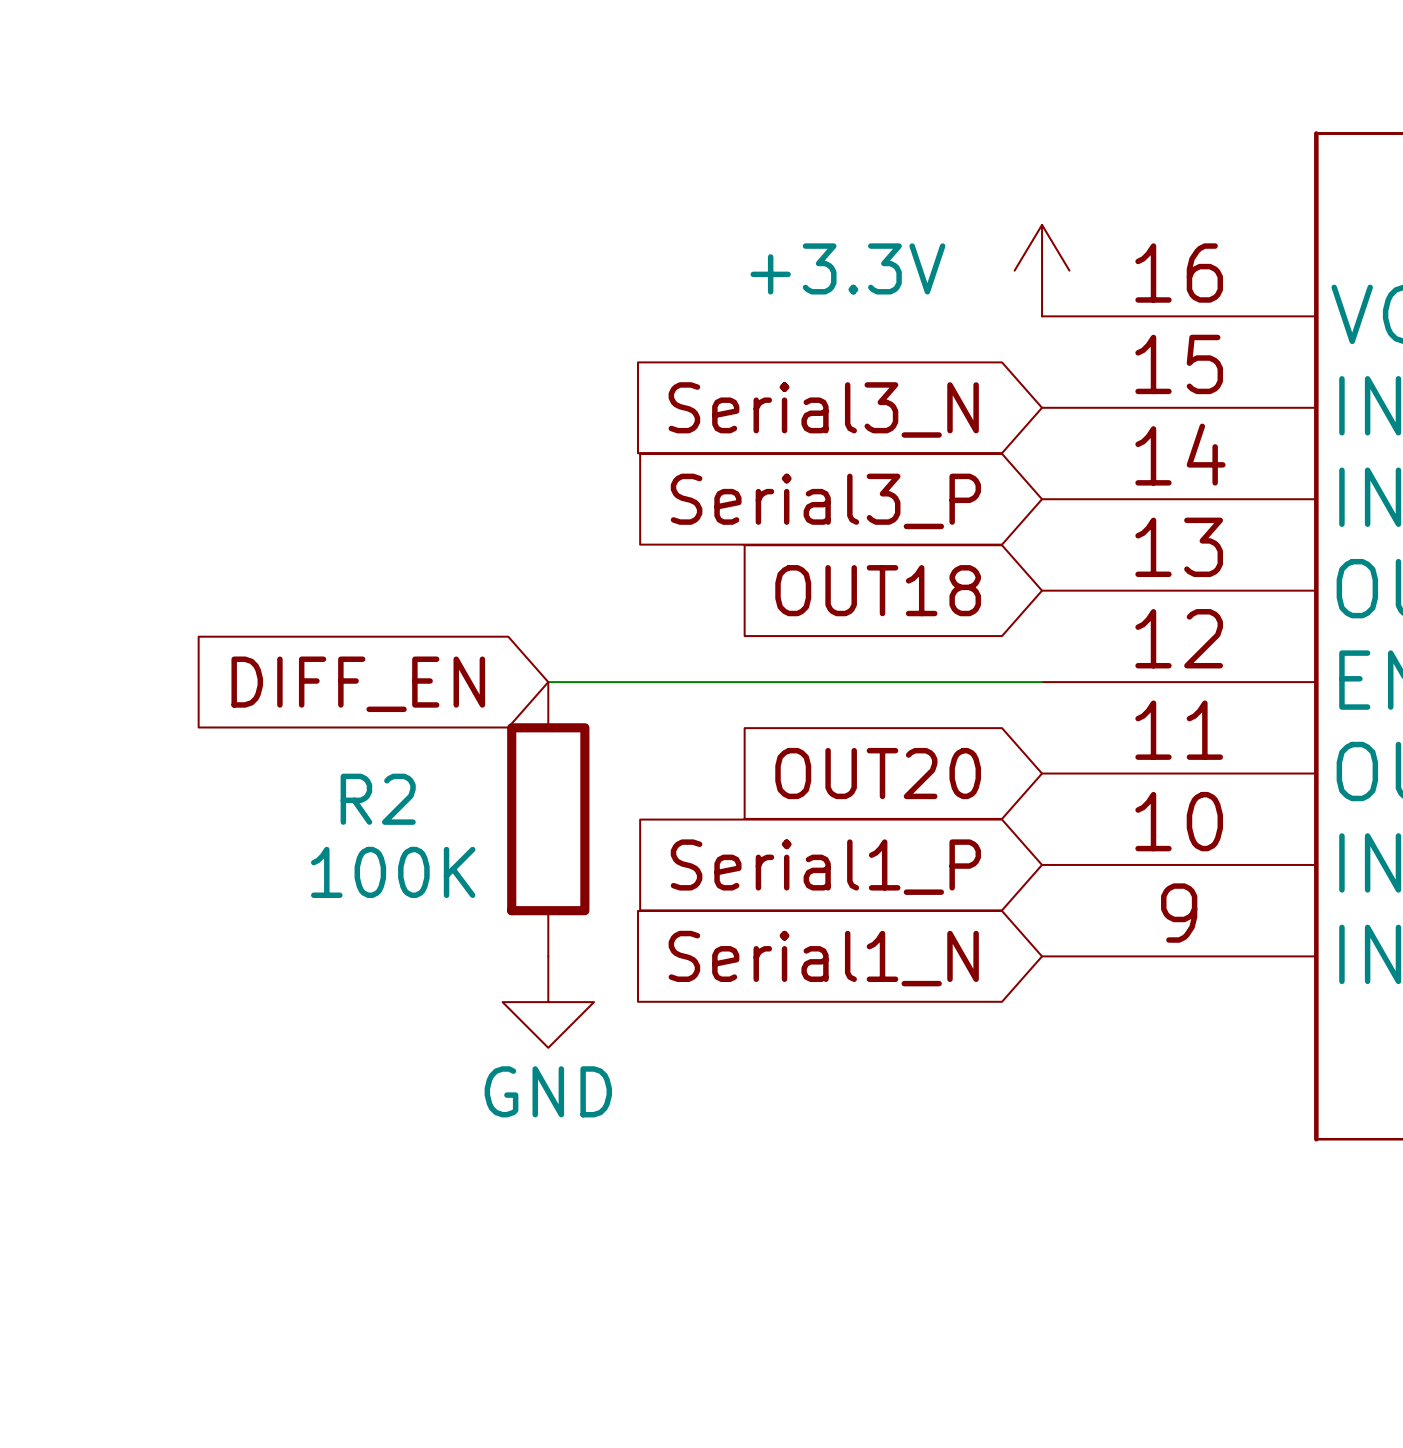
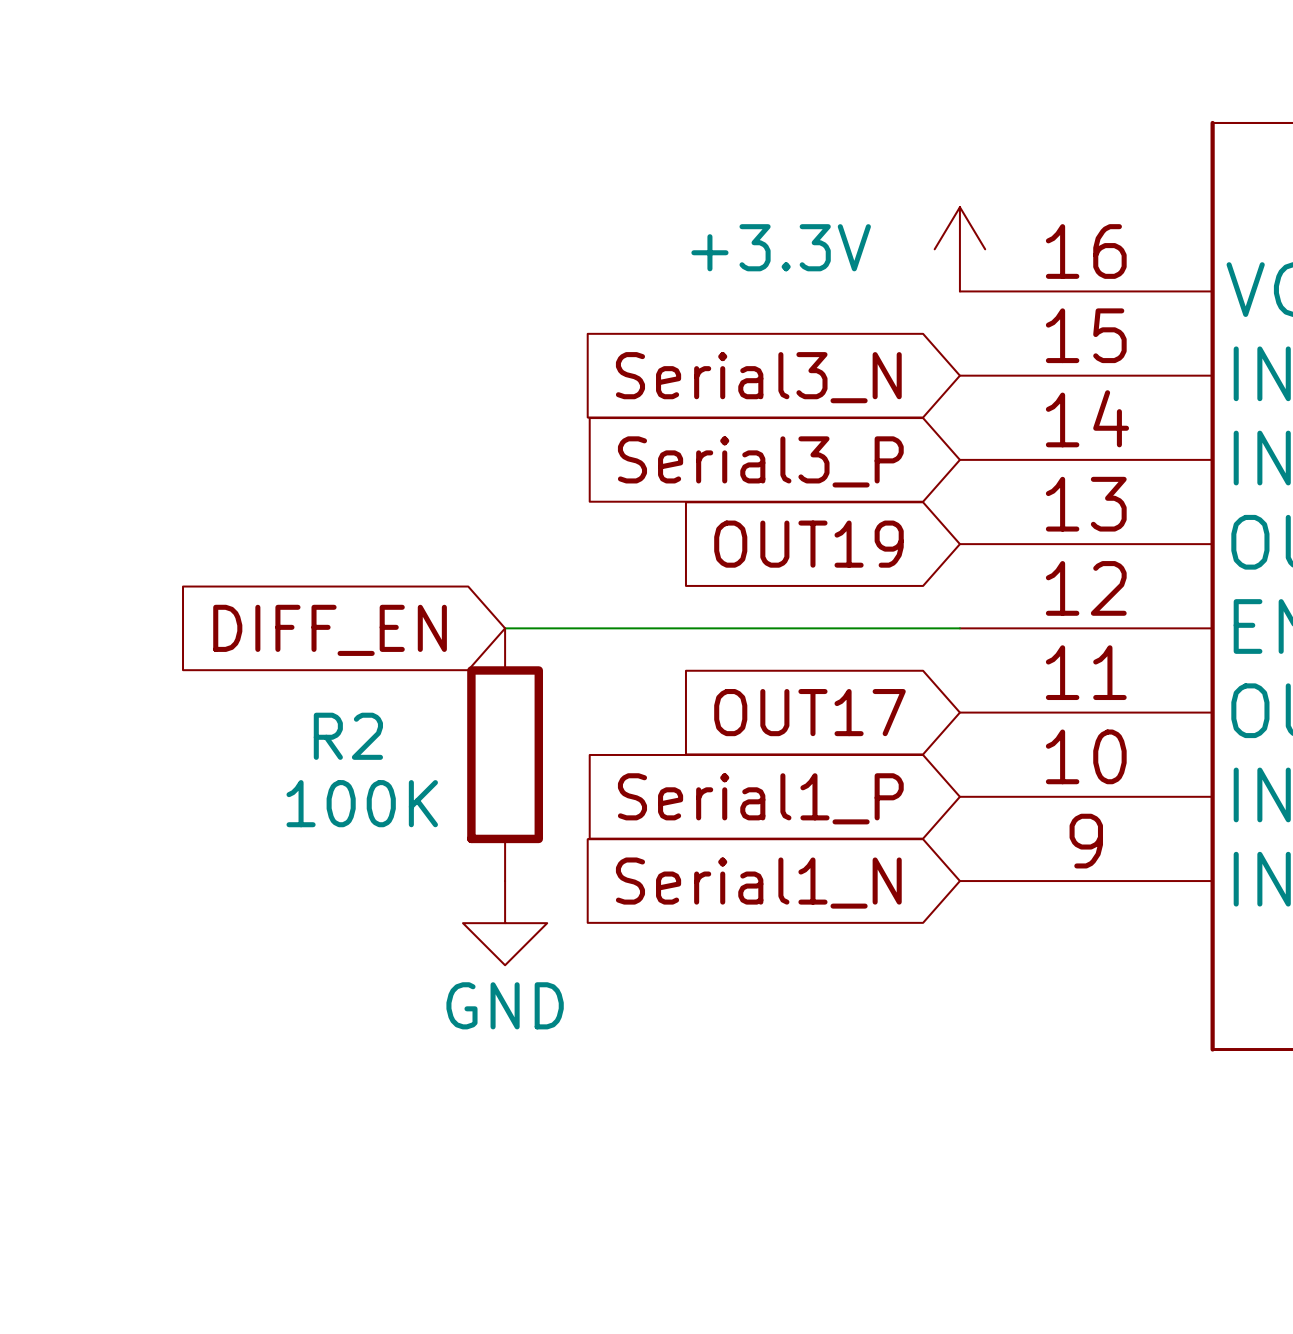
global label: OUT18 (878, 590) -> OUT19 (808, 544)
global label: OUT20 (878, 773) -> OUT17 (809, 712)

